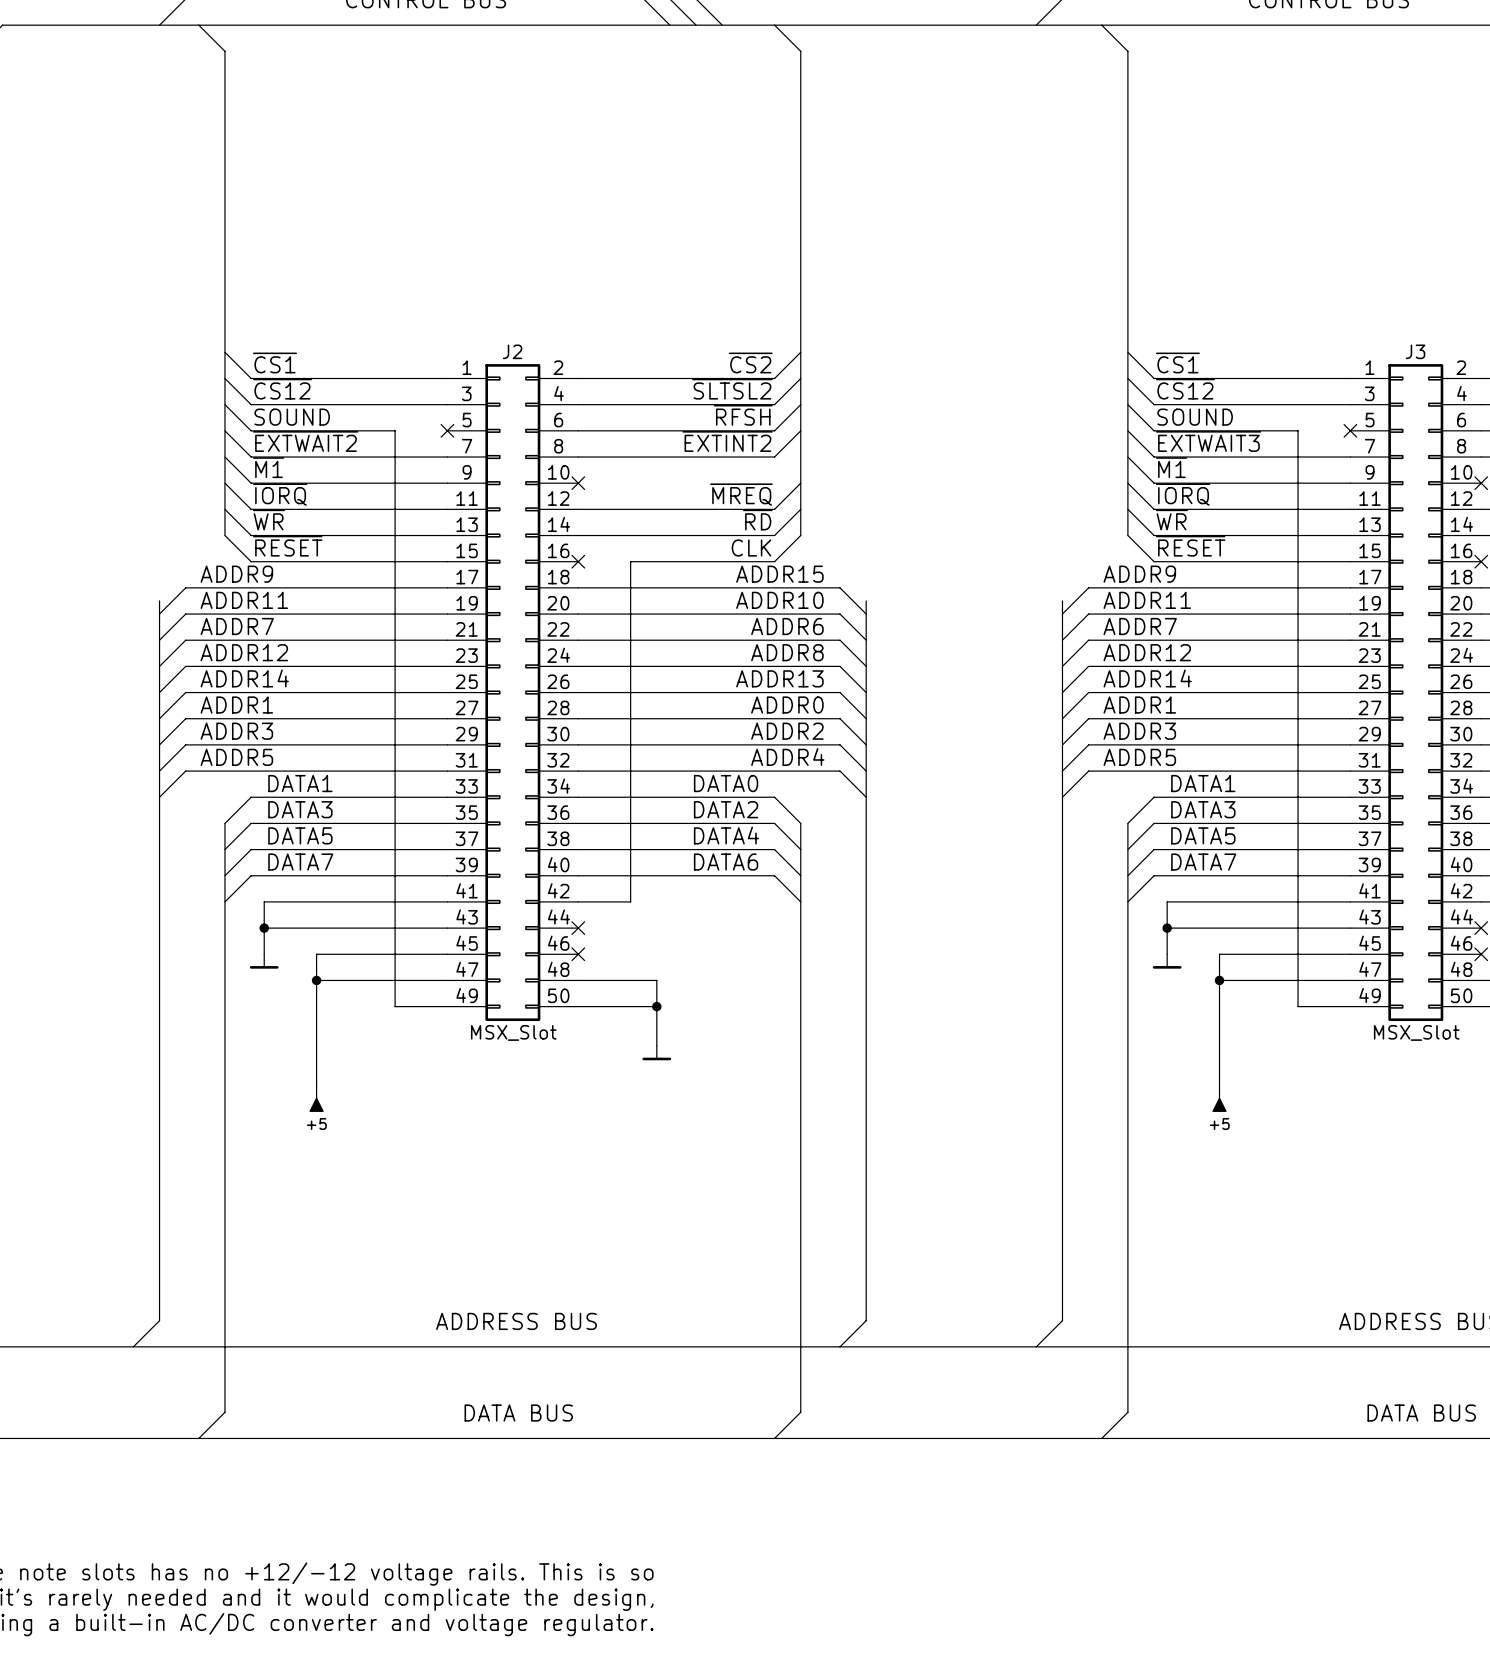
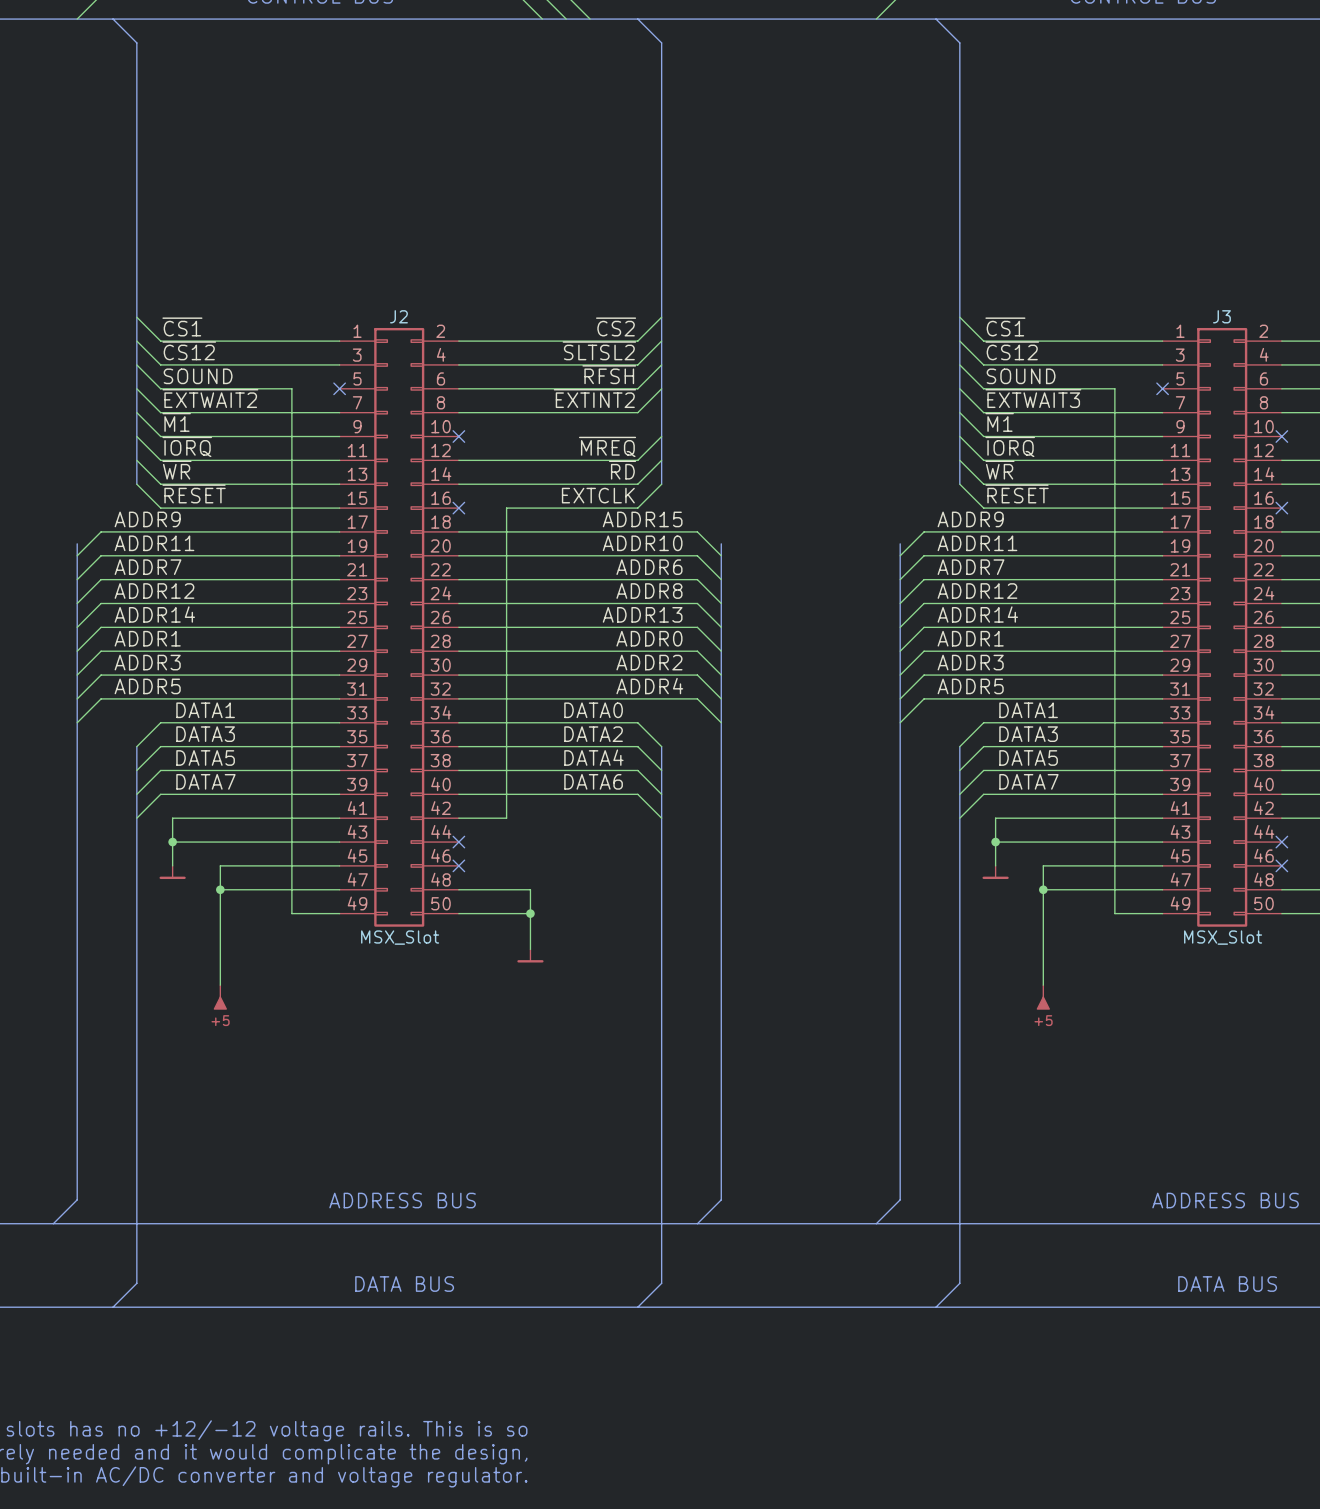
label: CLK (751, 547) -> EXTCLK (598, 495)

